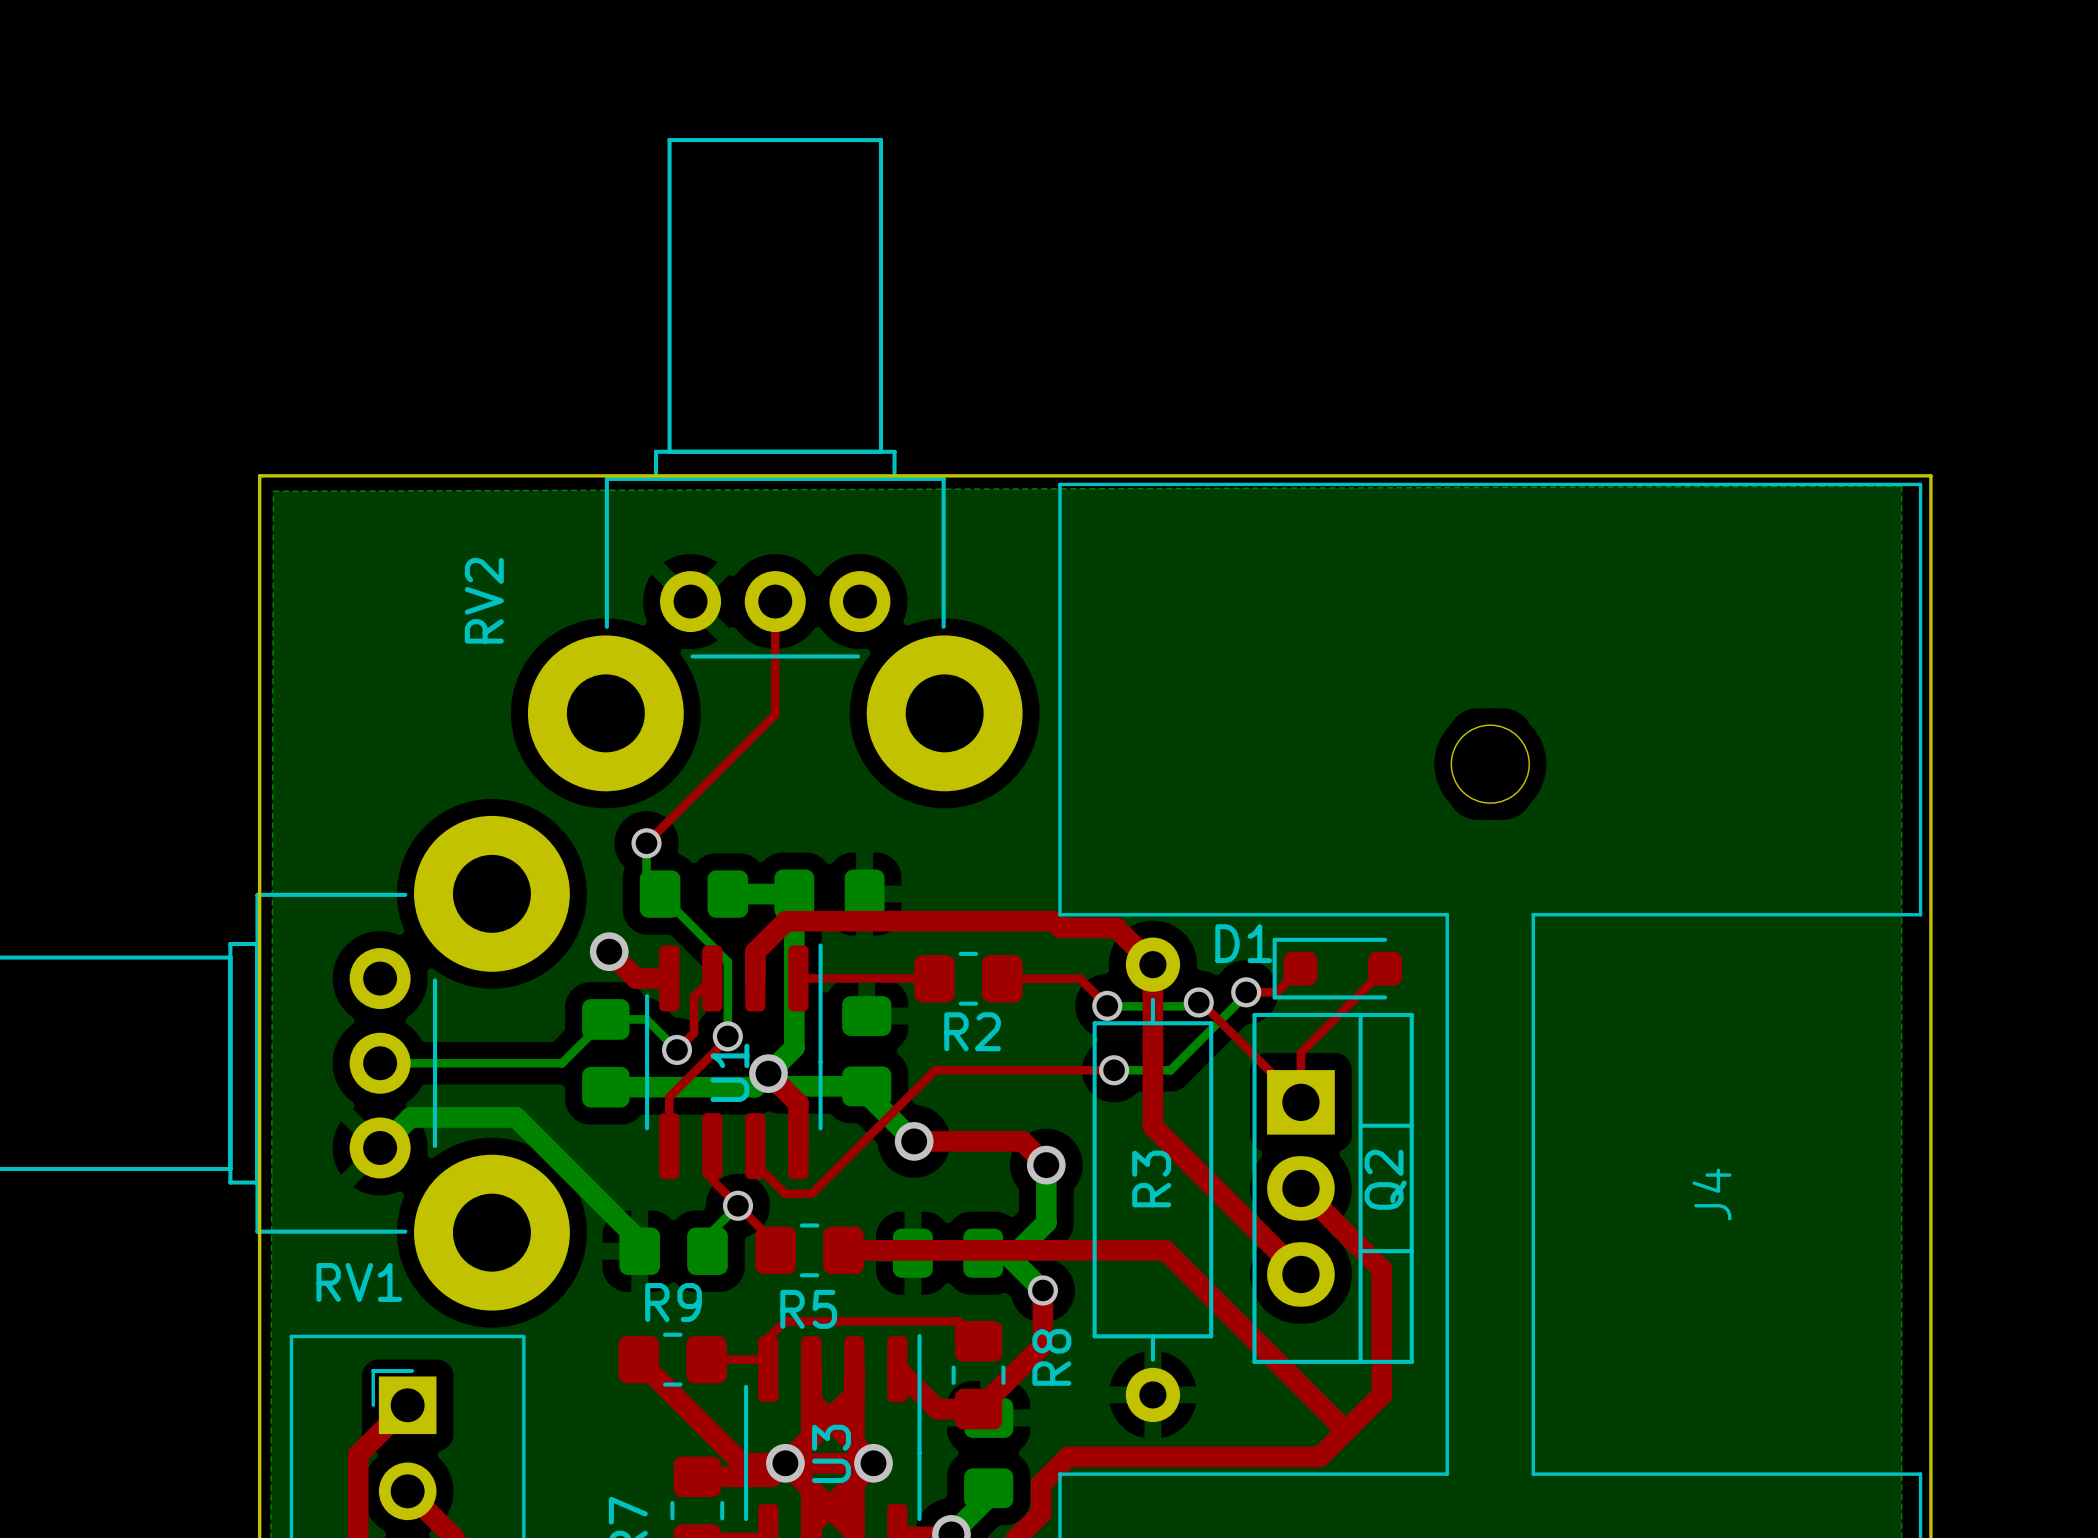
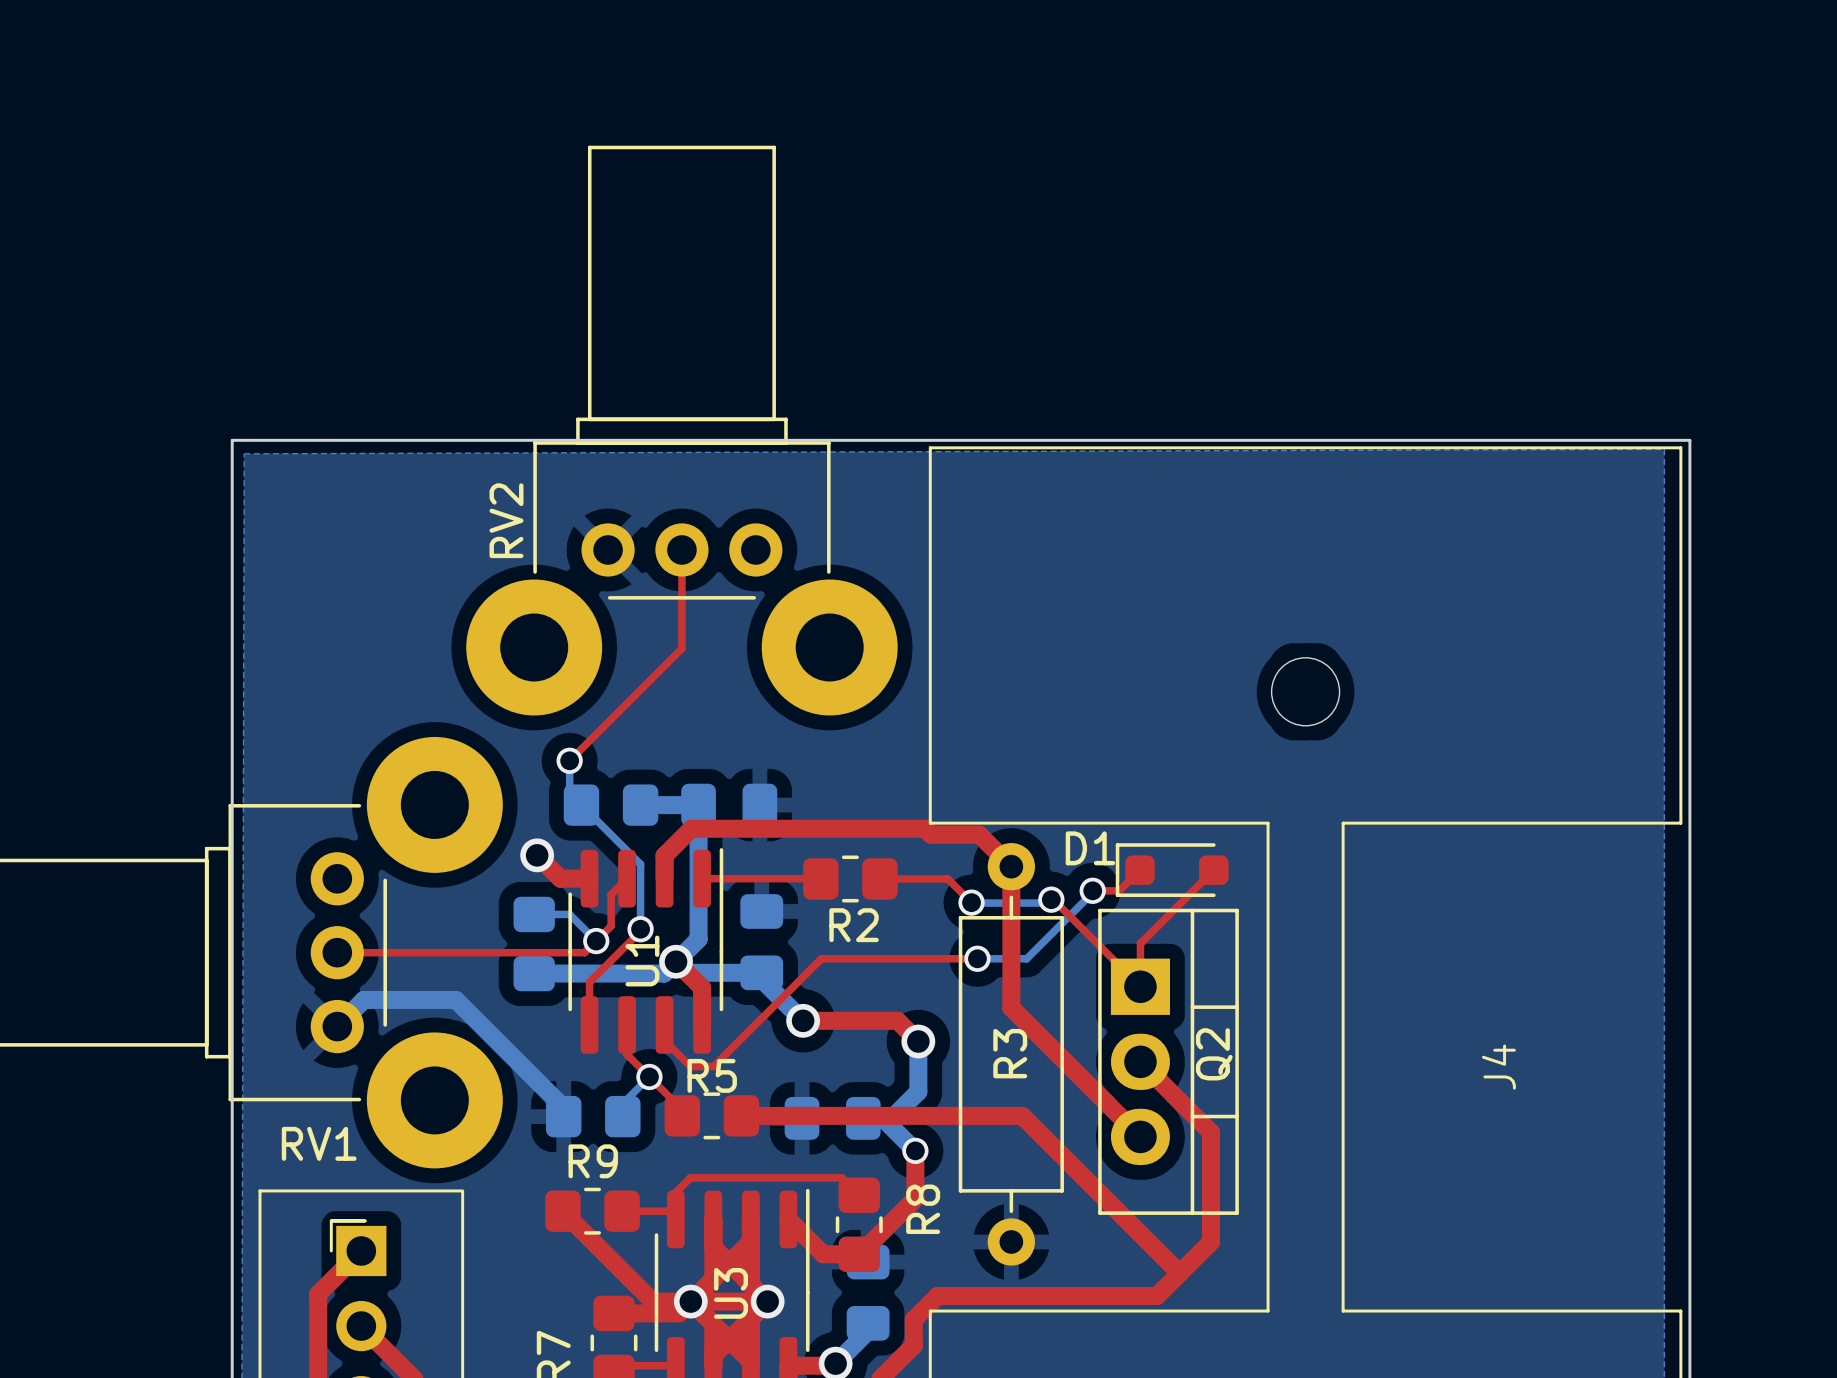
RV2 name position: RV2 (484, 600) -> RV2 (506, 520)
bottom track: (605, 1019) (562, 1063) (380, 1063) -> none
top track: none -> (596, 941) (584, 952) (337, 952)
R5 name position: R5 (808, 1309) -> R5 (712, 1075)

